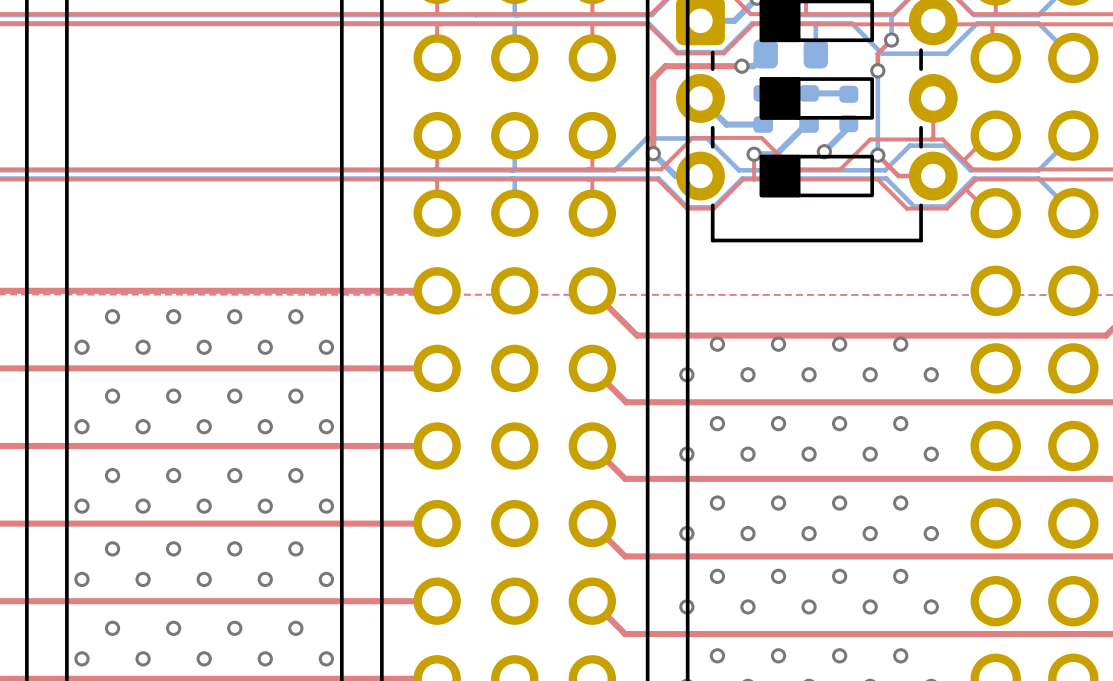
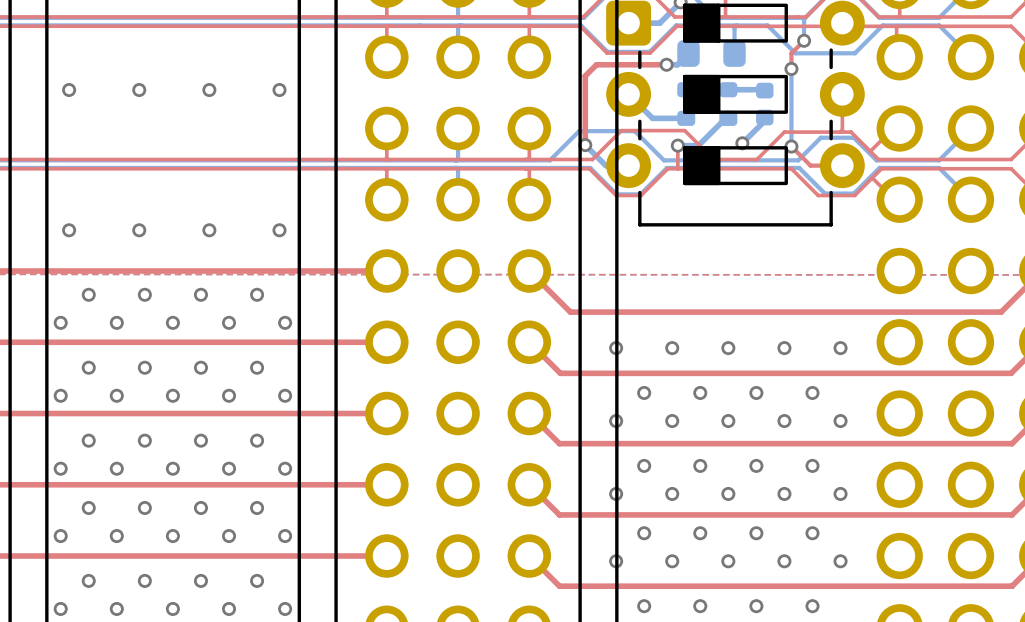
via: none -> (69, 90)
via: none -> (139, 90)
via: none -> (209, 90)
via: none -> (279, 90)
via: none -> (69, 230)
via: none -> (139, 230)
via: none -> (209, 230)
via: none -> (279, 230)
via: (717, 344) -> none
via: (778, 344) -> none
via: (839, 344) -> none
via: (900, 344) -> none

